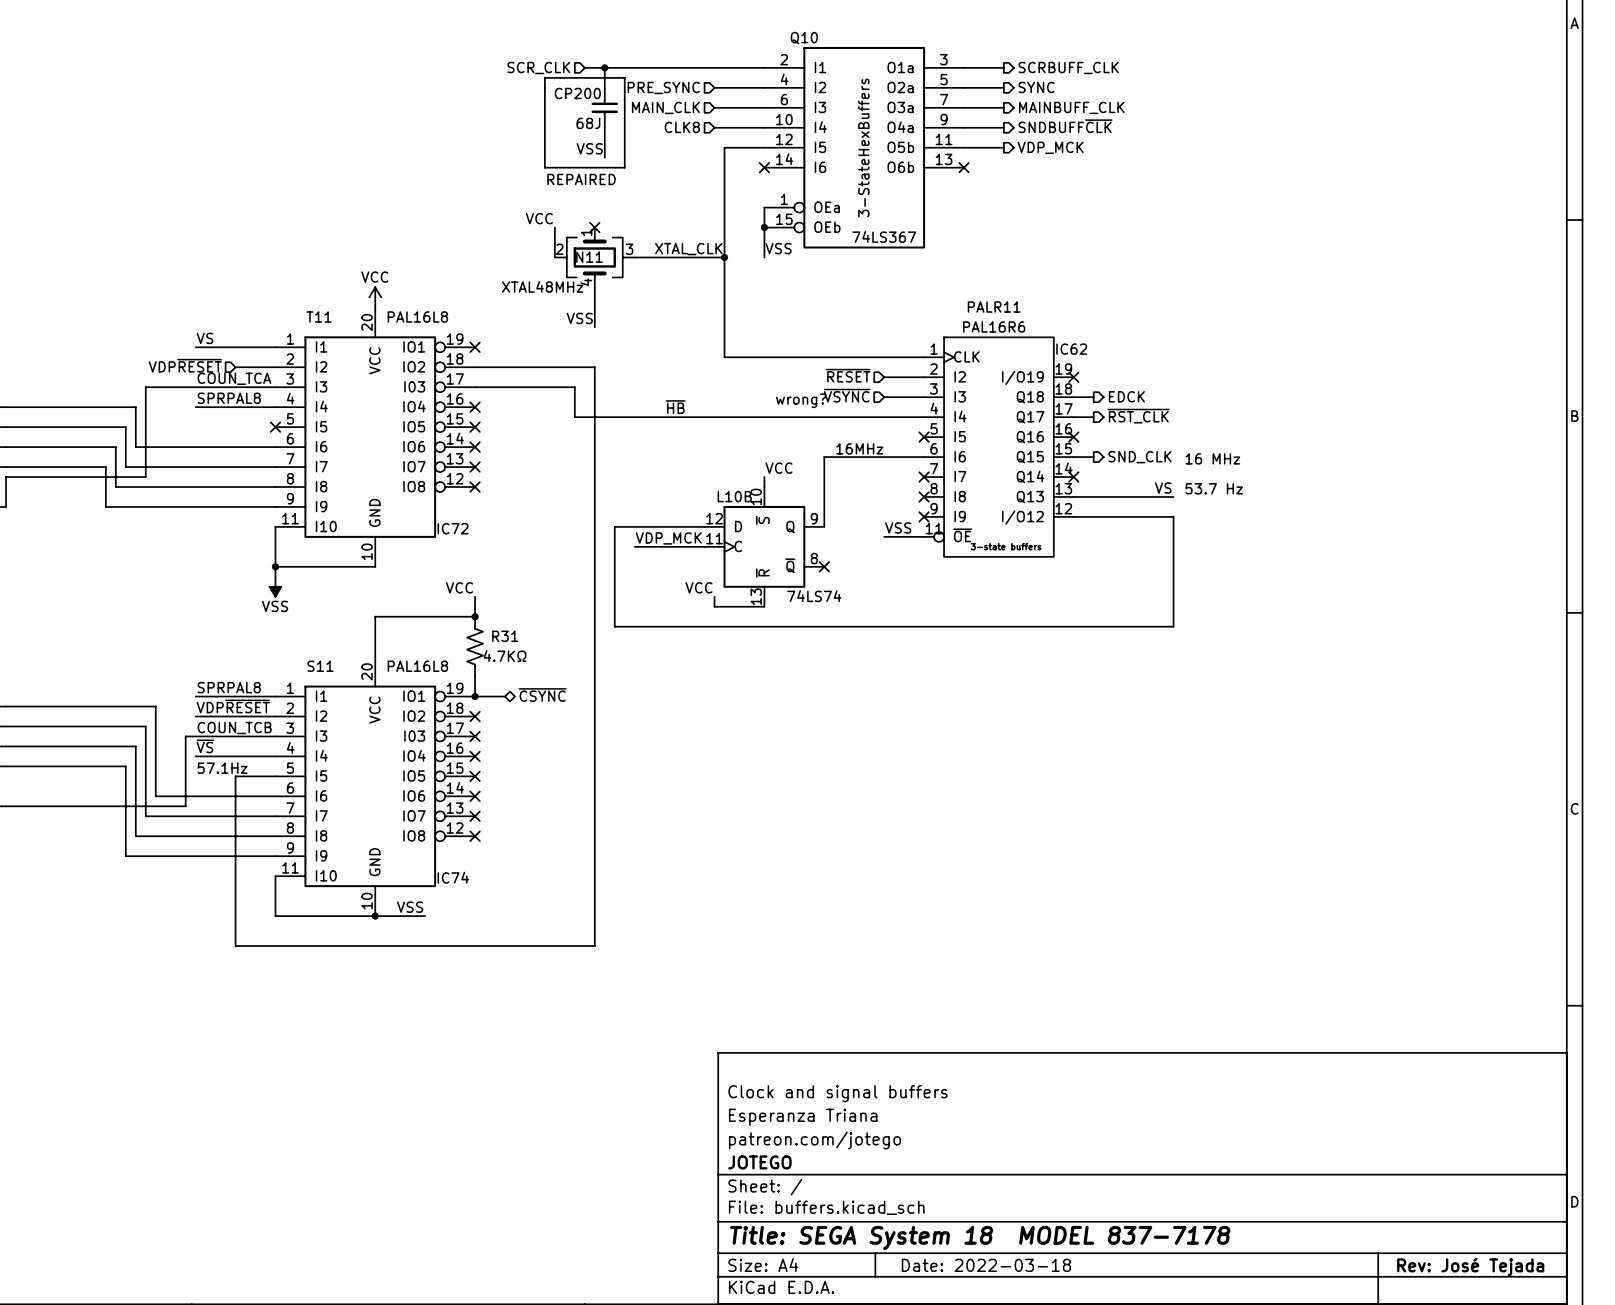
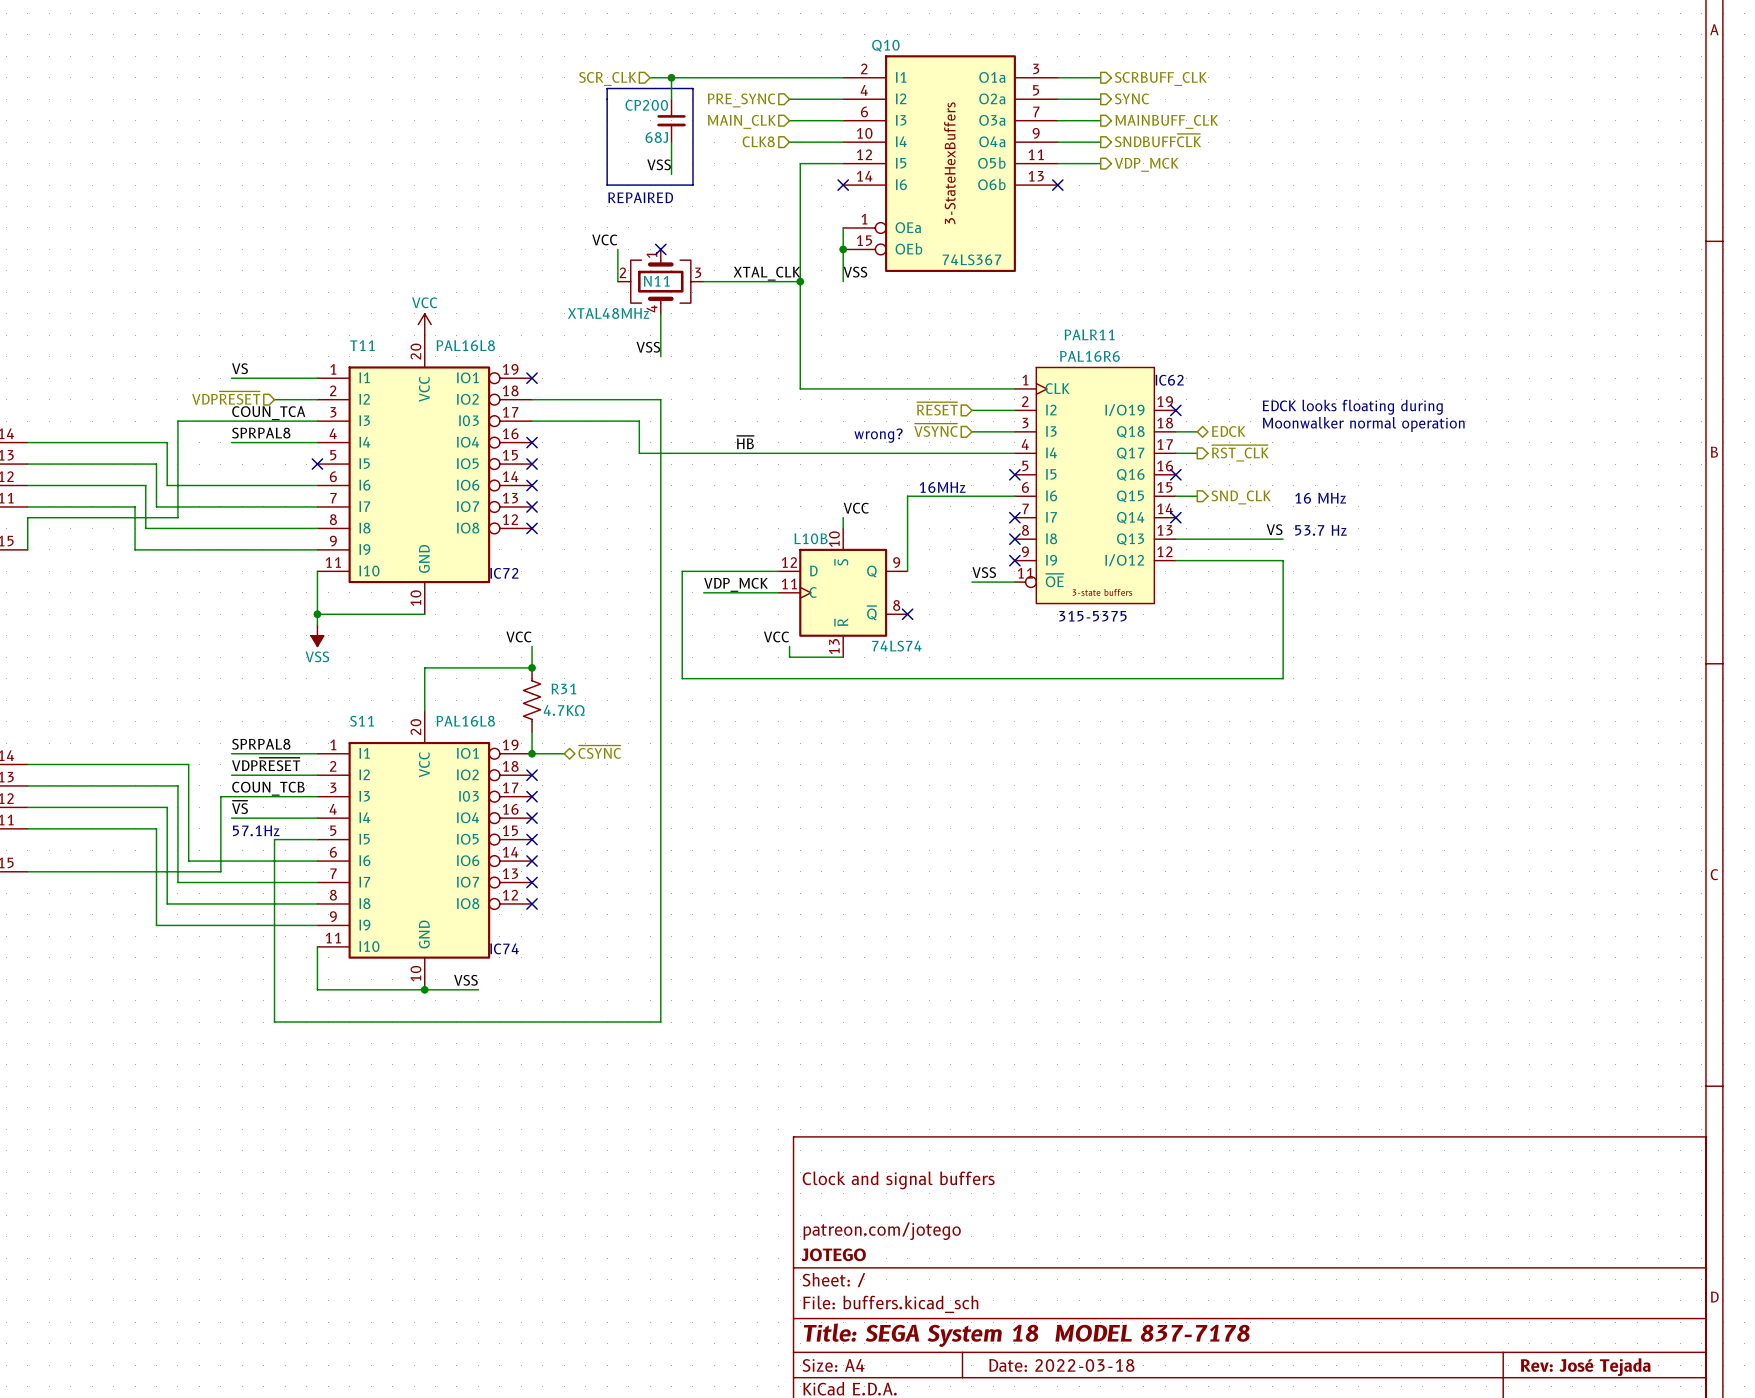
text: none -> EDCK looks floating during (1352, 407)
text: none -> Moonwalker normal operation (1363, 424)
hierarchical label shape: output (1126, 396) -> bidirectional (1228, 431)
text: none -> 315-5375 (1092, 616)
title block: Esperanza Triana (803, 1117) -> none

